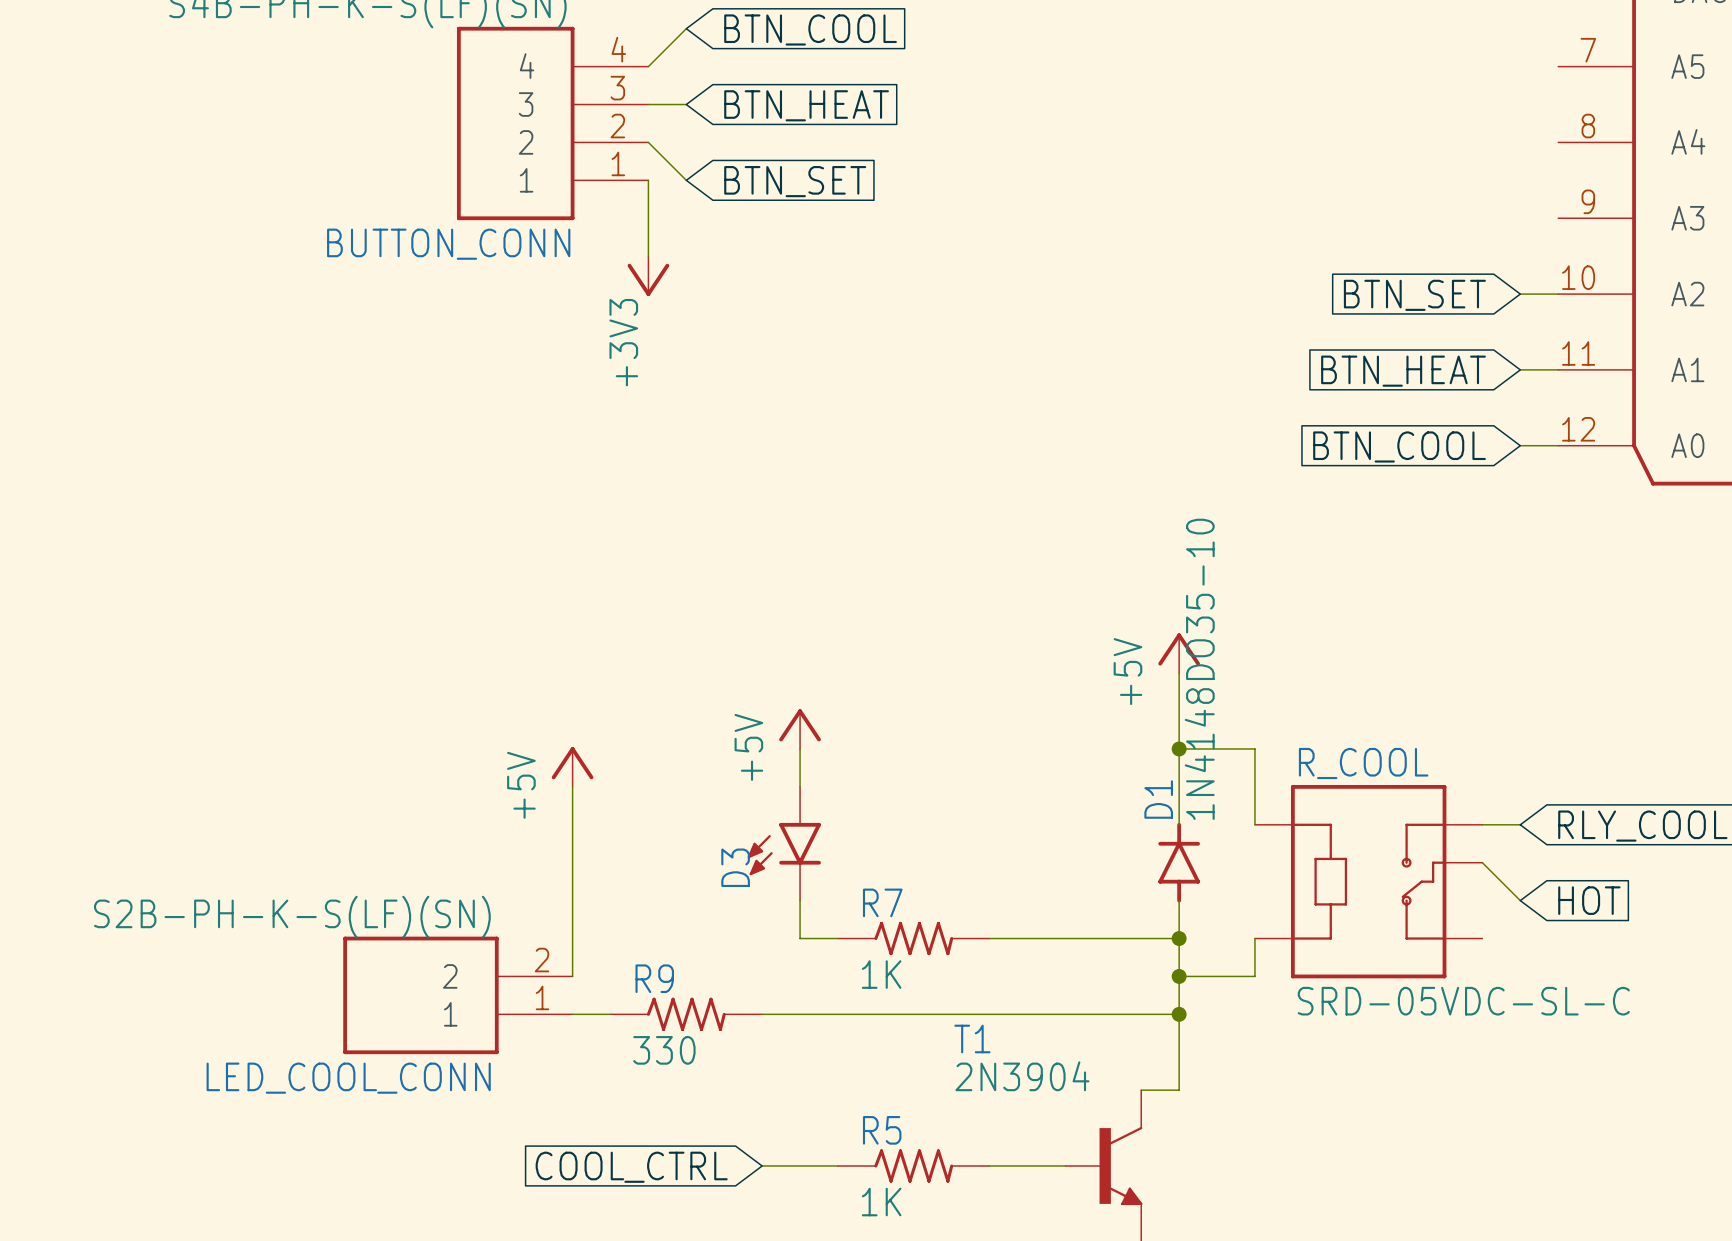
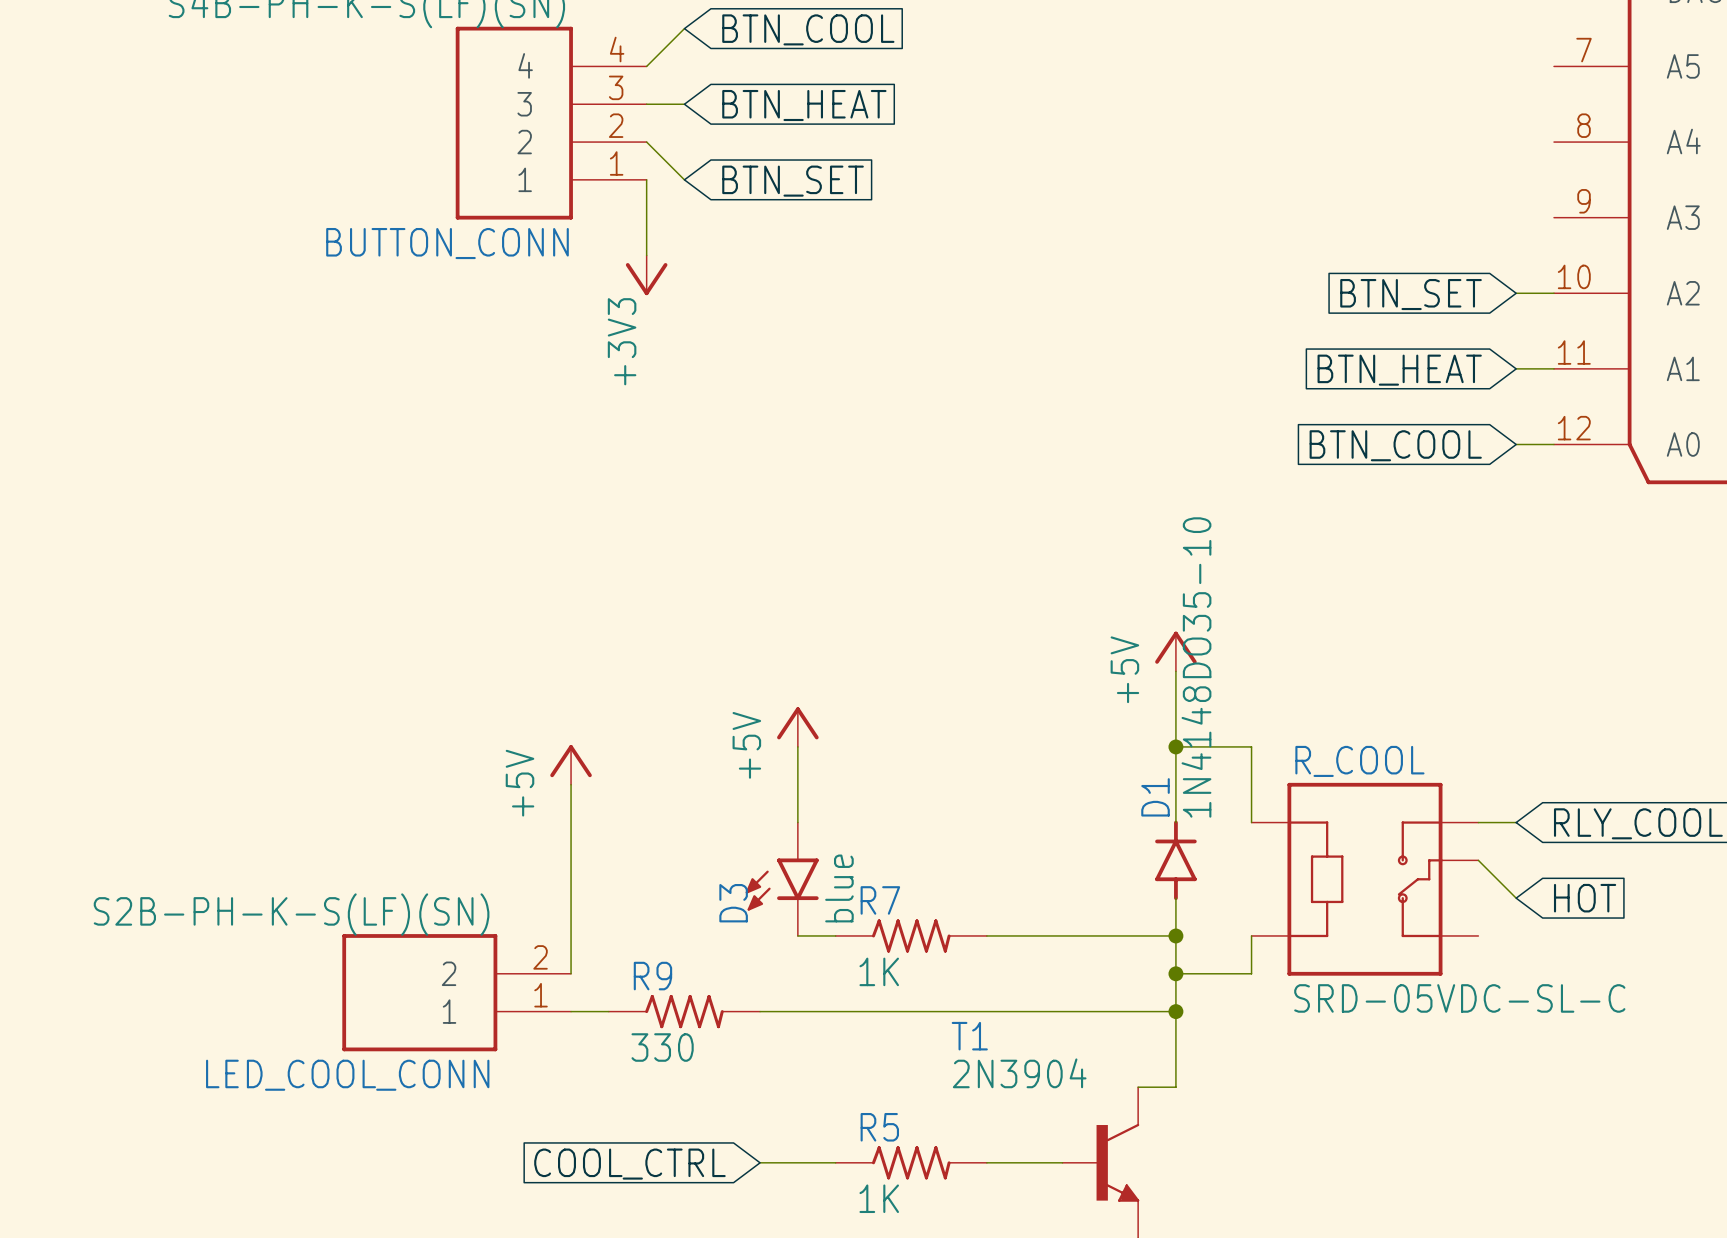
D3 position: (784, 843) -> (782, 879)
D3 value: none -> blue (839, 888)

